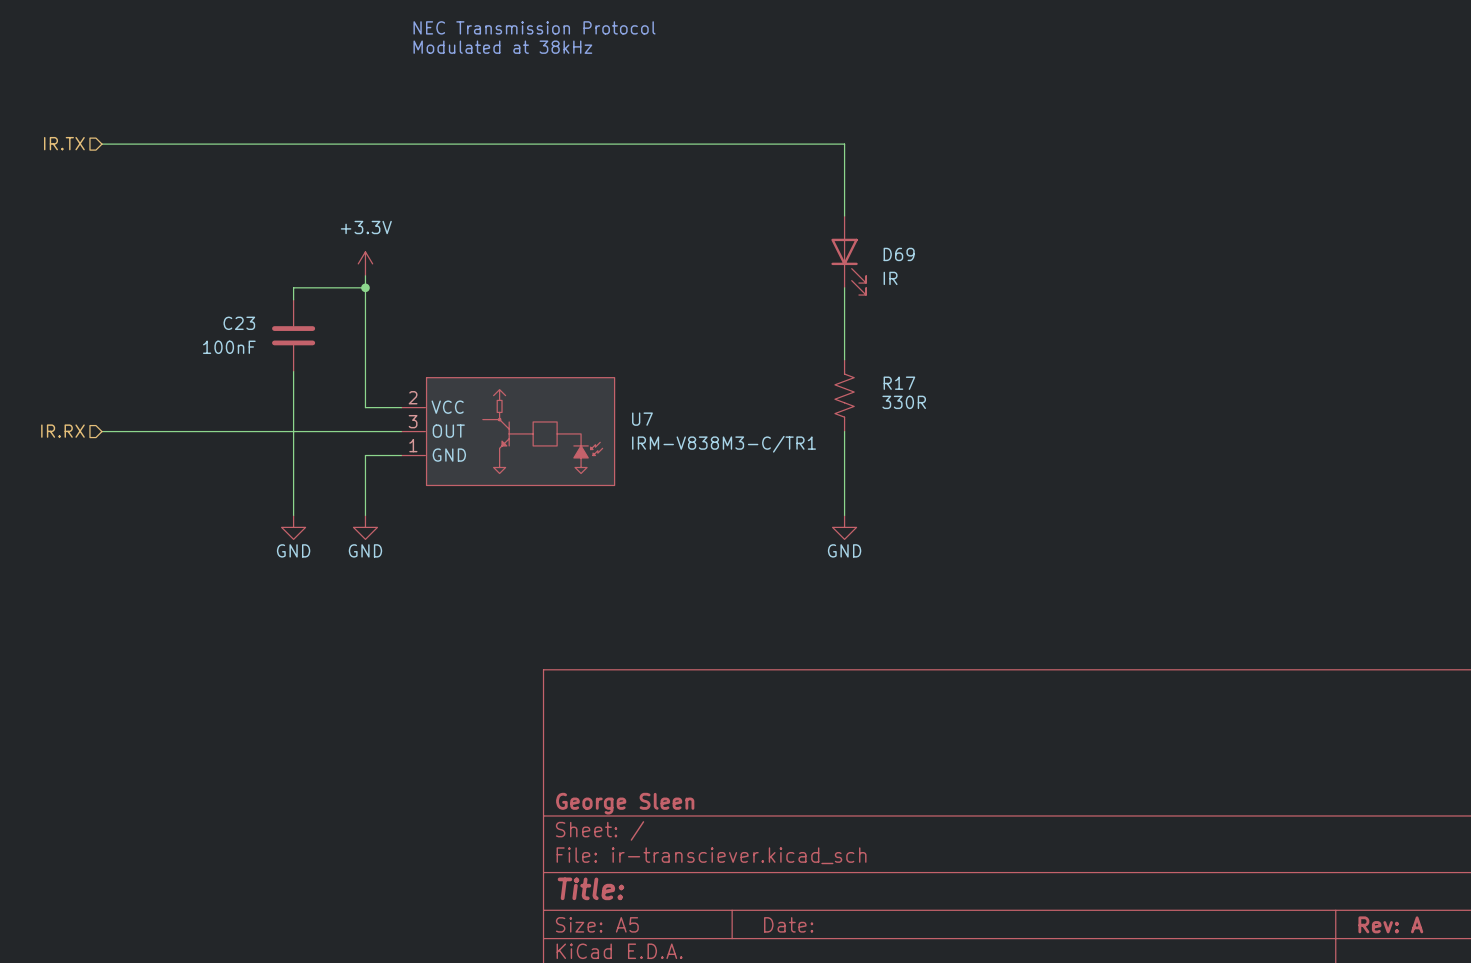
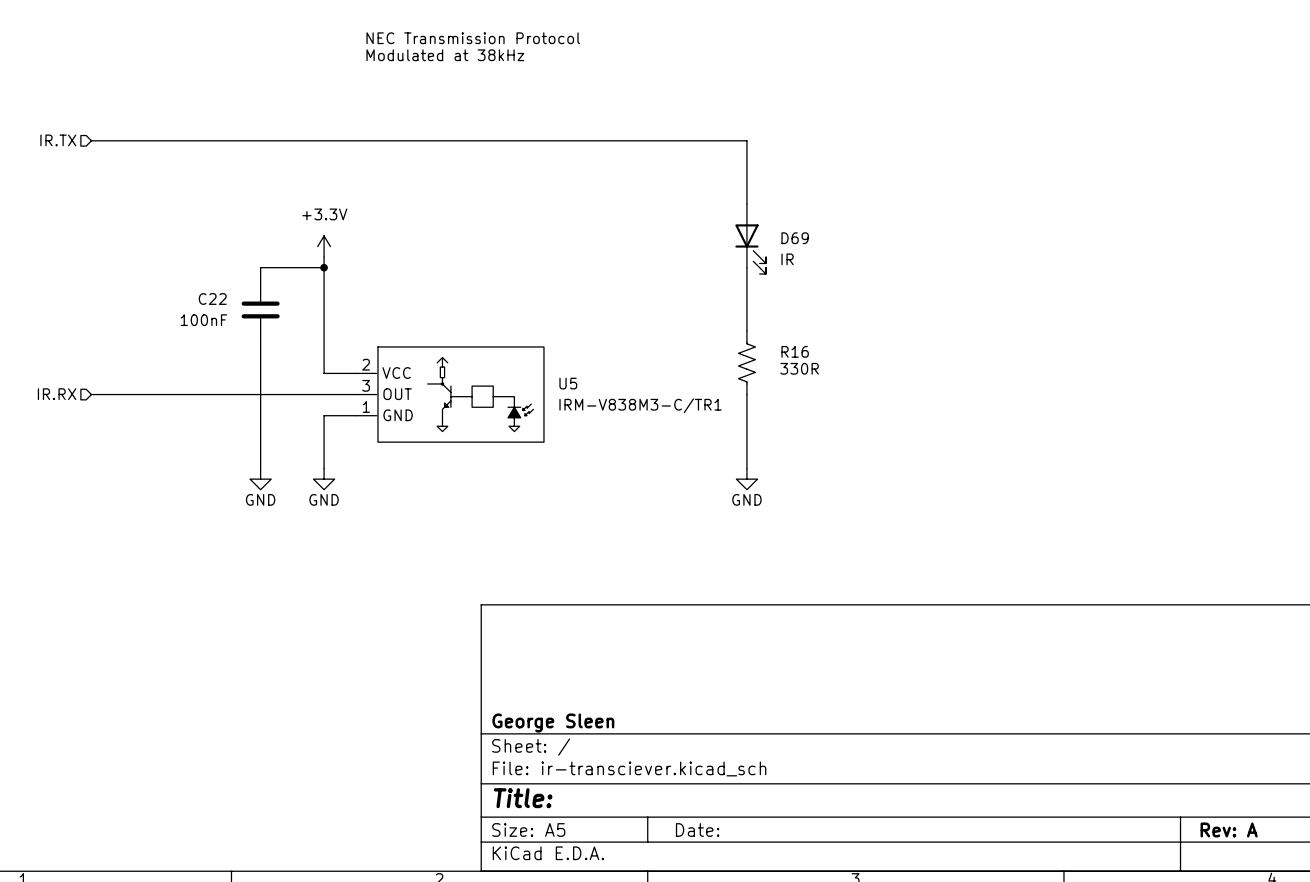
C23 name: C23 (239, 323) -> C22 (212, 299)
R17 name: R17 (899, 383) -> R16 (795, 351)
U7 name: U7 (642, 419) -> U5 (568, 383)

